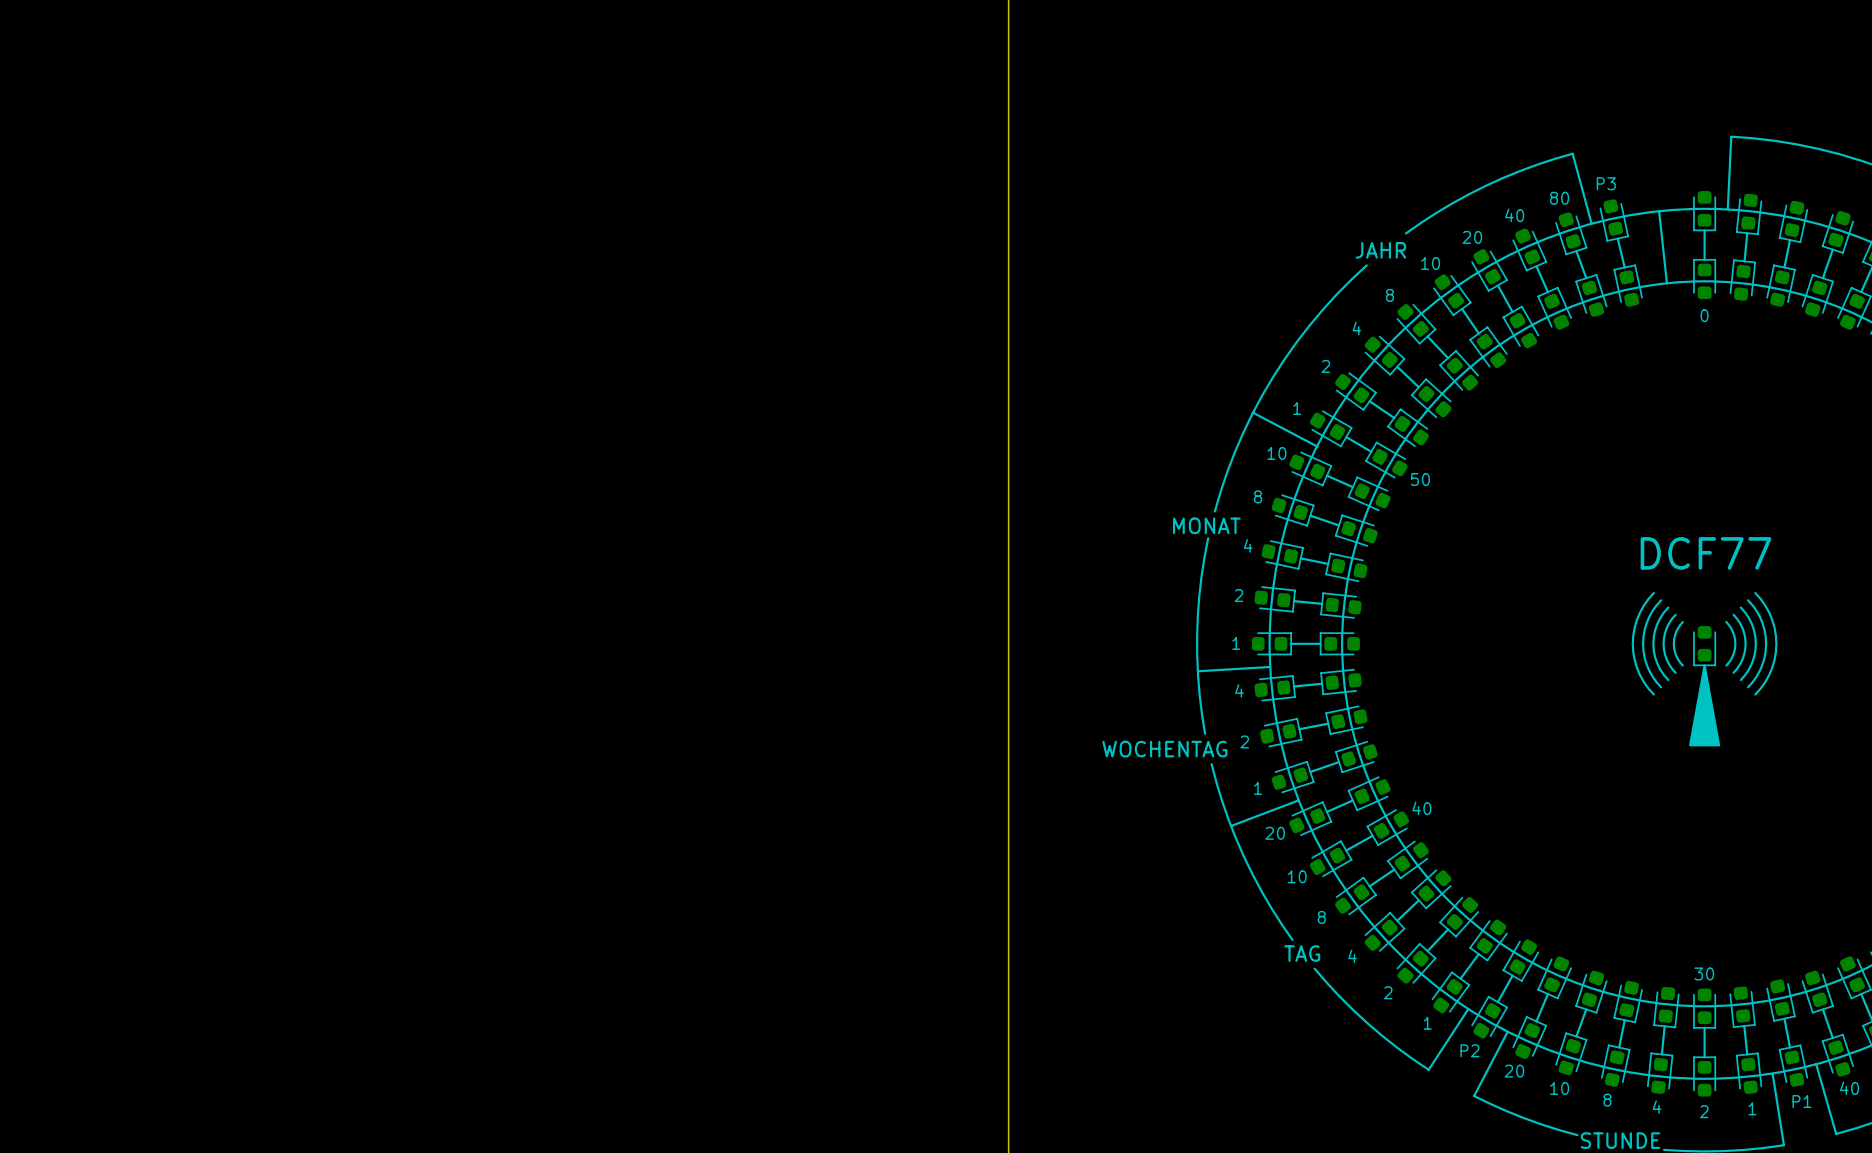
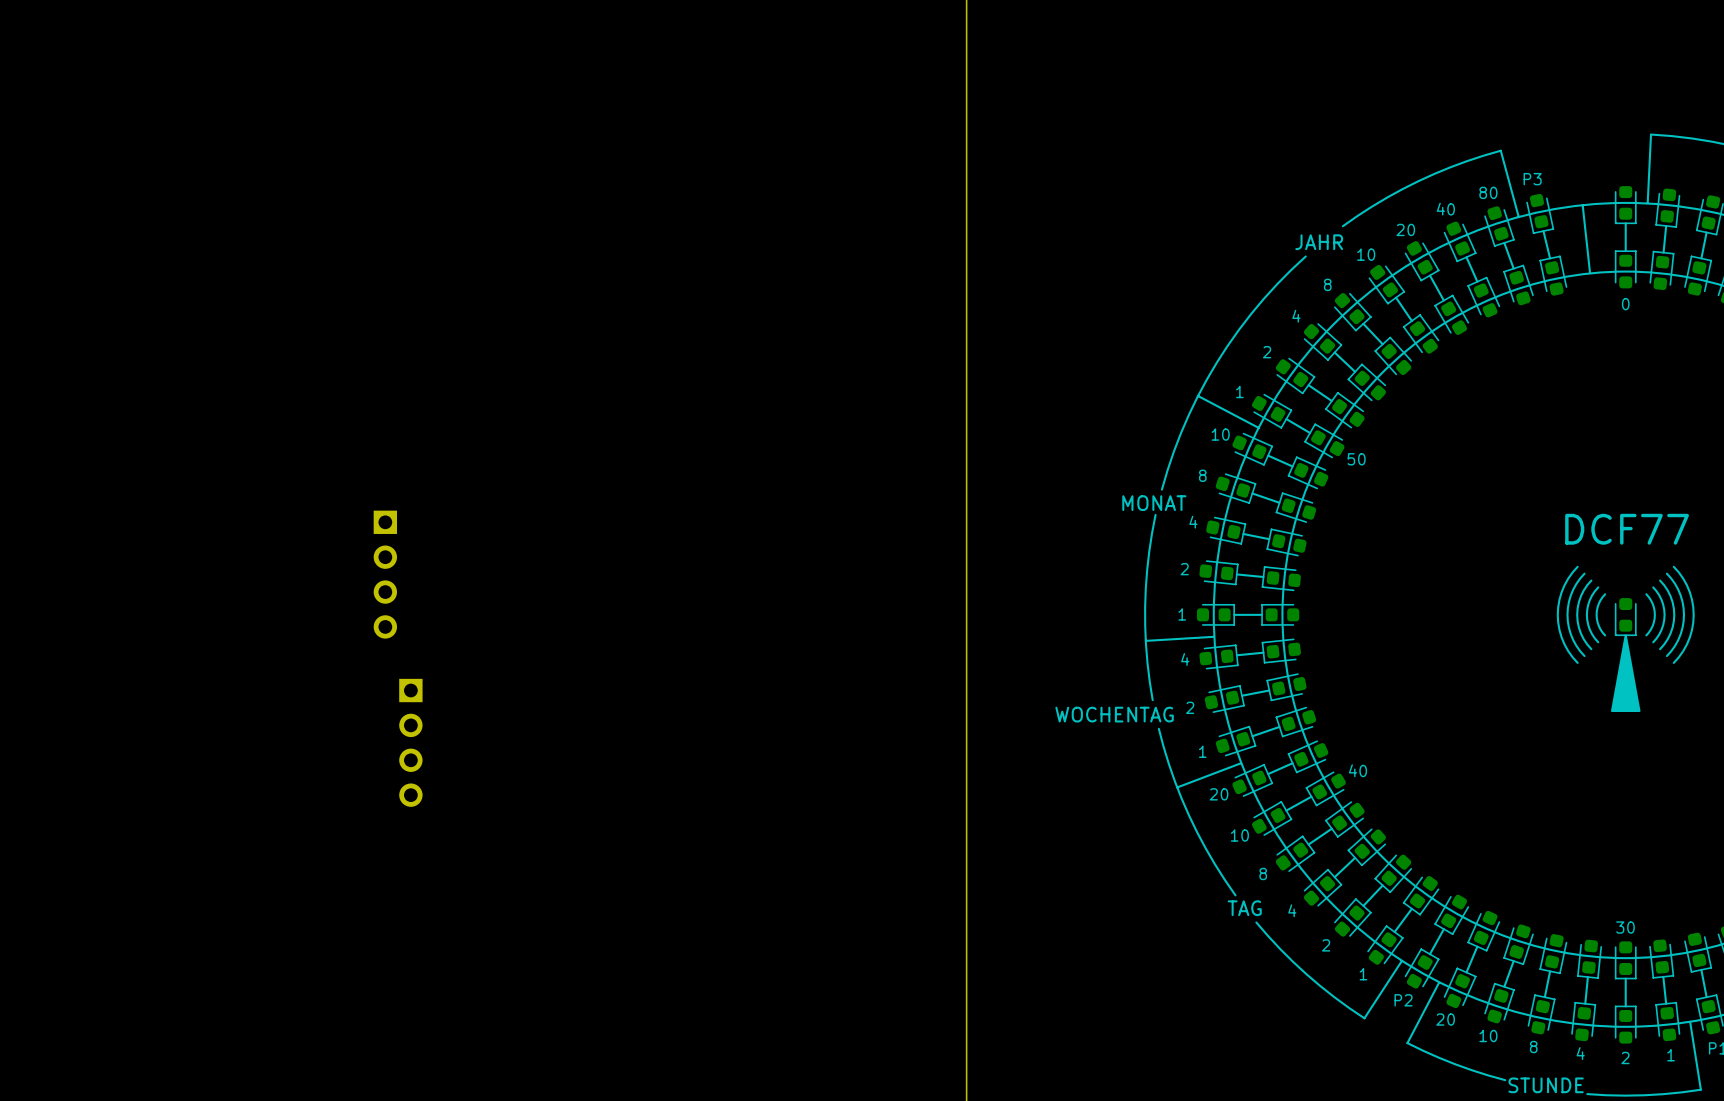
part: none -> (385, 574)
part: none -> (410, 742)

